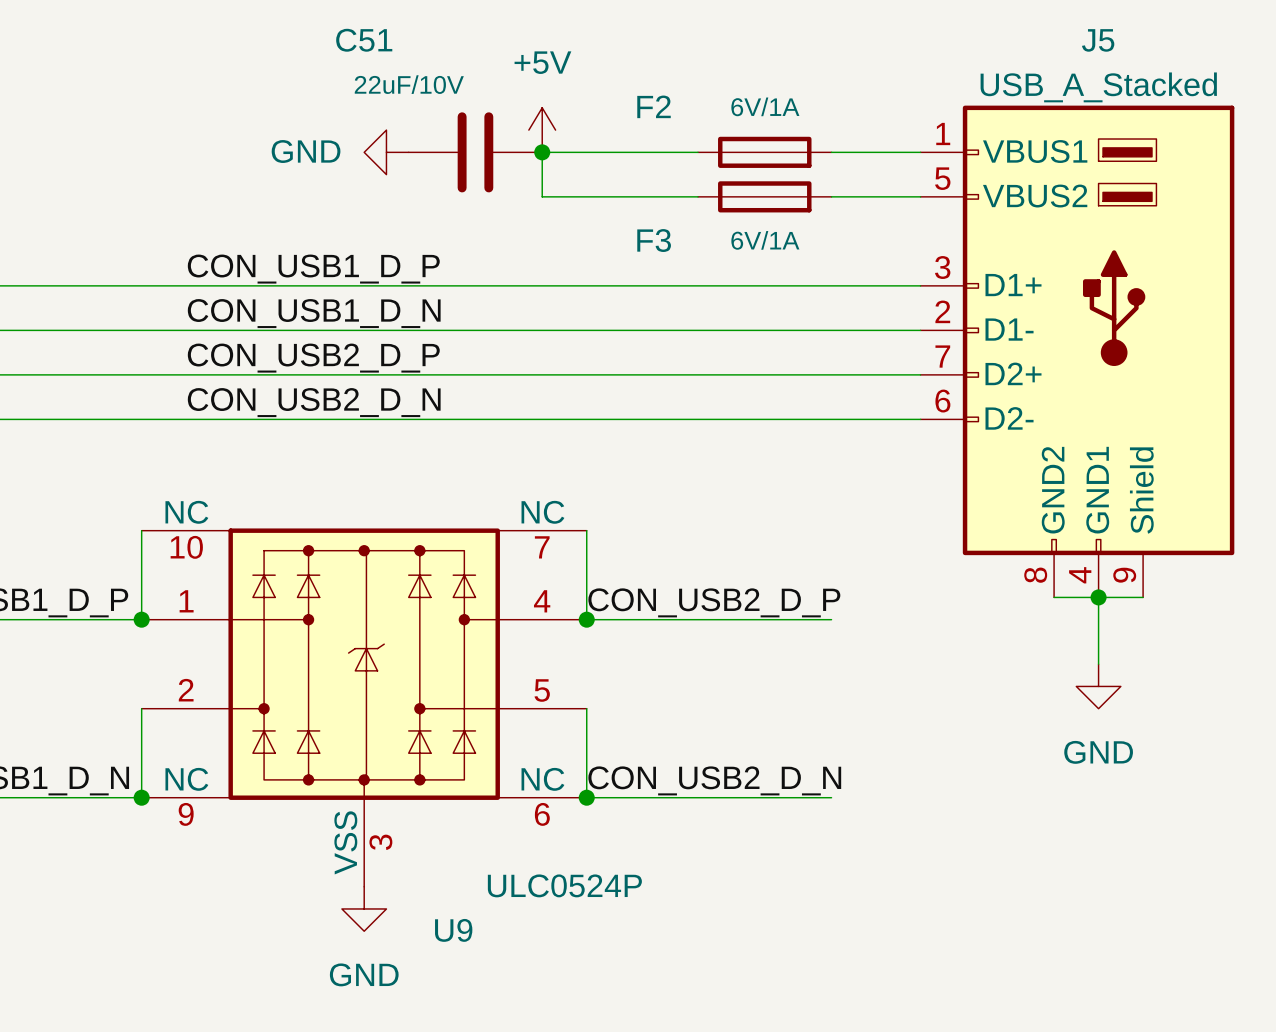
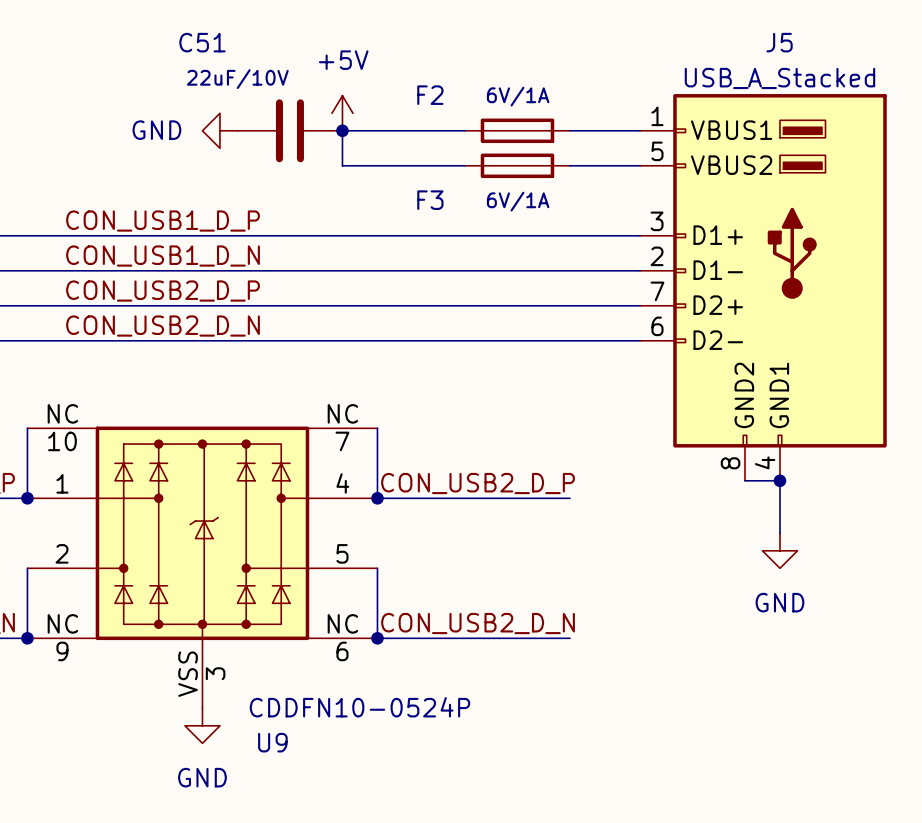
J5 symbol: [920, 105, 1235, 598] -> [639, 94, 887, 481]
wire: (1098, 597) (1143, 597) -> none
U9 value: ULC0524P (564, 885) -> CDDFN10-0524P (359, 707)

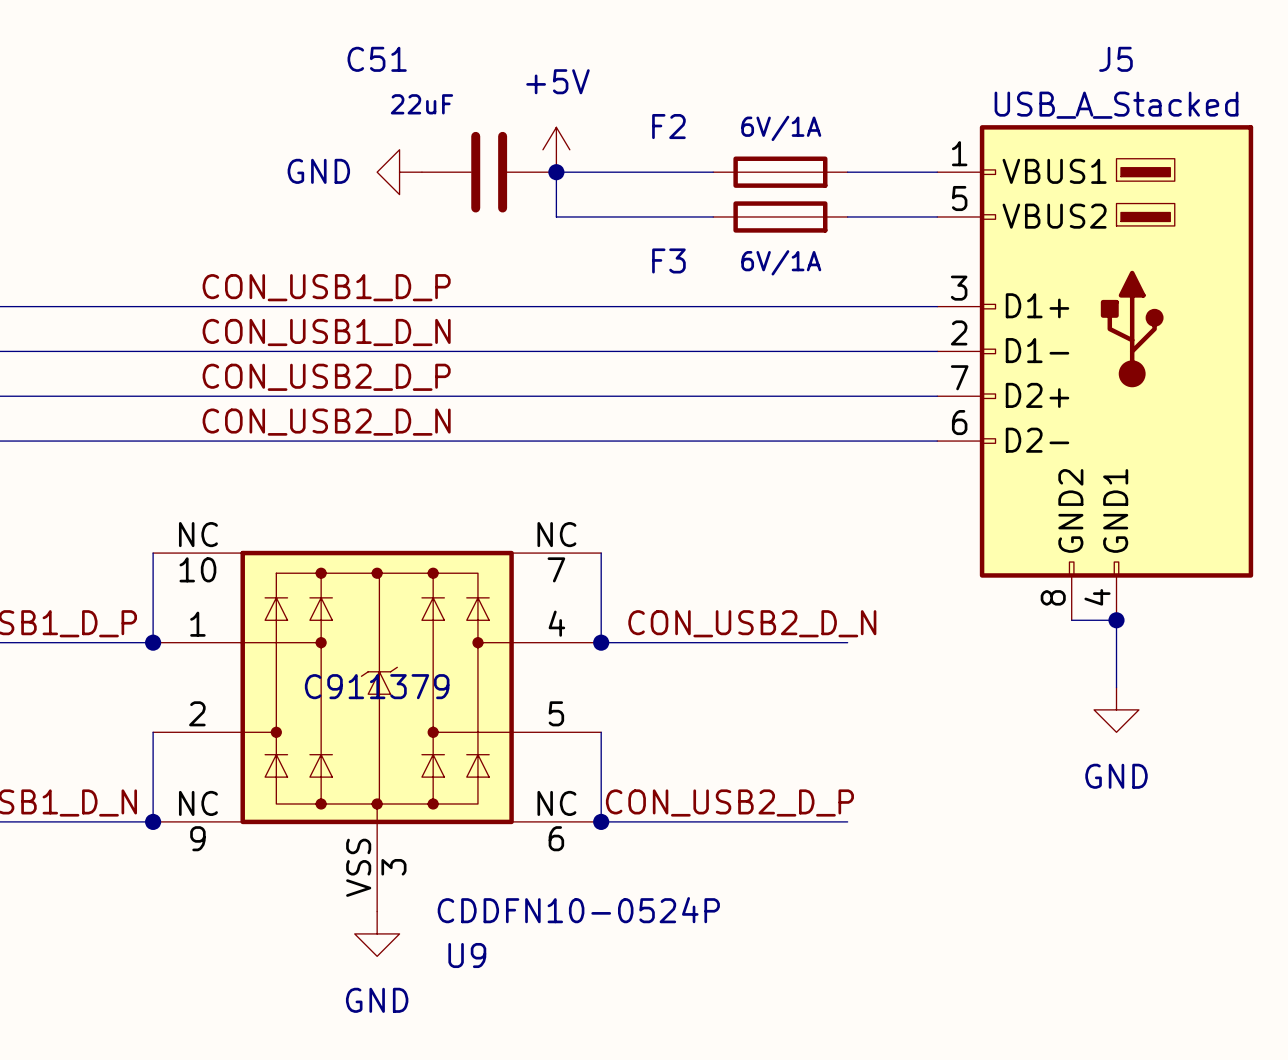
C51 value: 22uF/10V (237, 79) -> 22uF (421, 104)
label: CON_USB2_D_P (478, 483) -> CON_USB2_D_N (752, 623)
U9 text: none -> C911379 (377, 686)
label: CON_USB2_D_N (478, 623) -> CON_USB2_D_P (729, 802)

